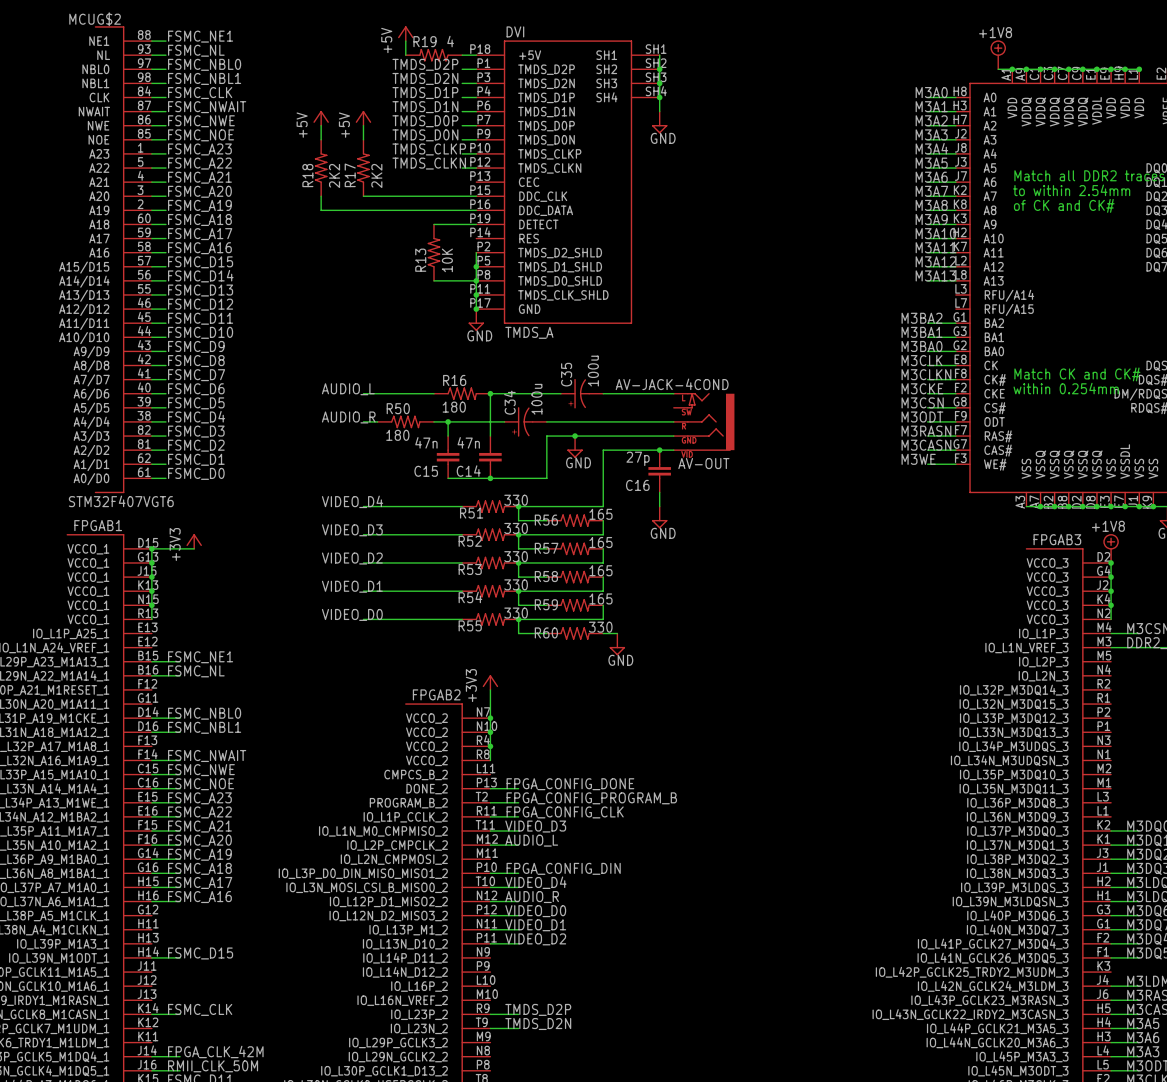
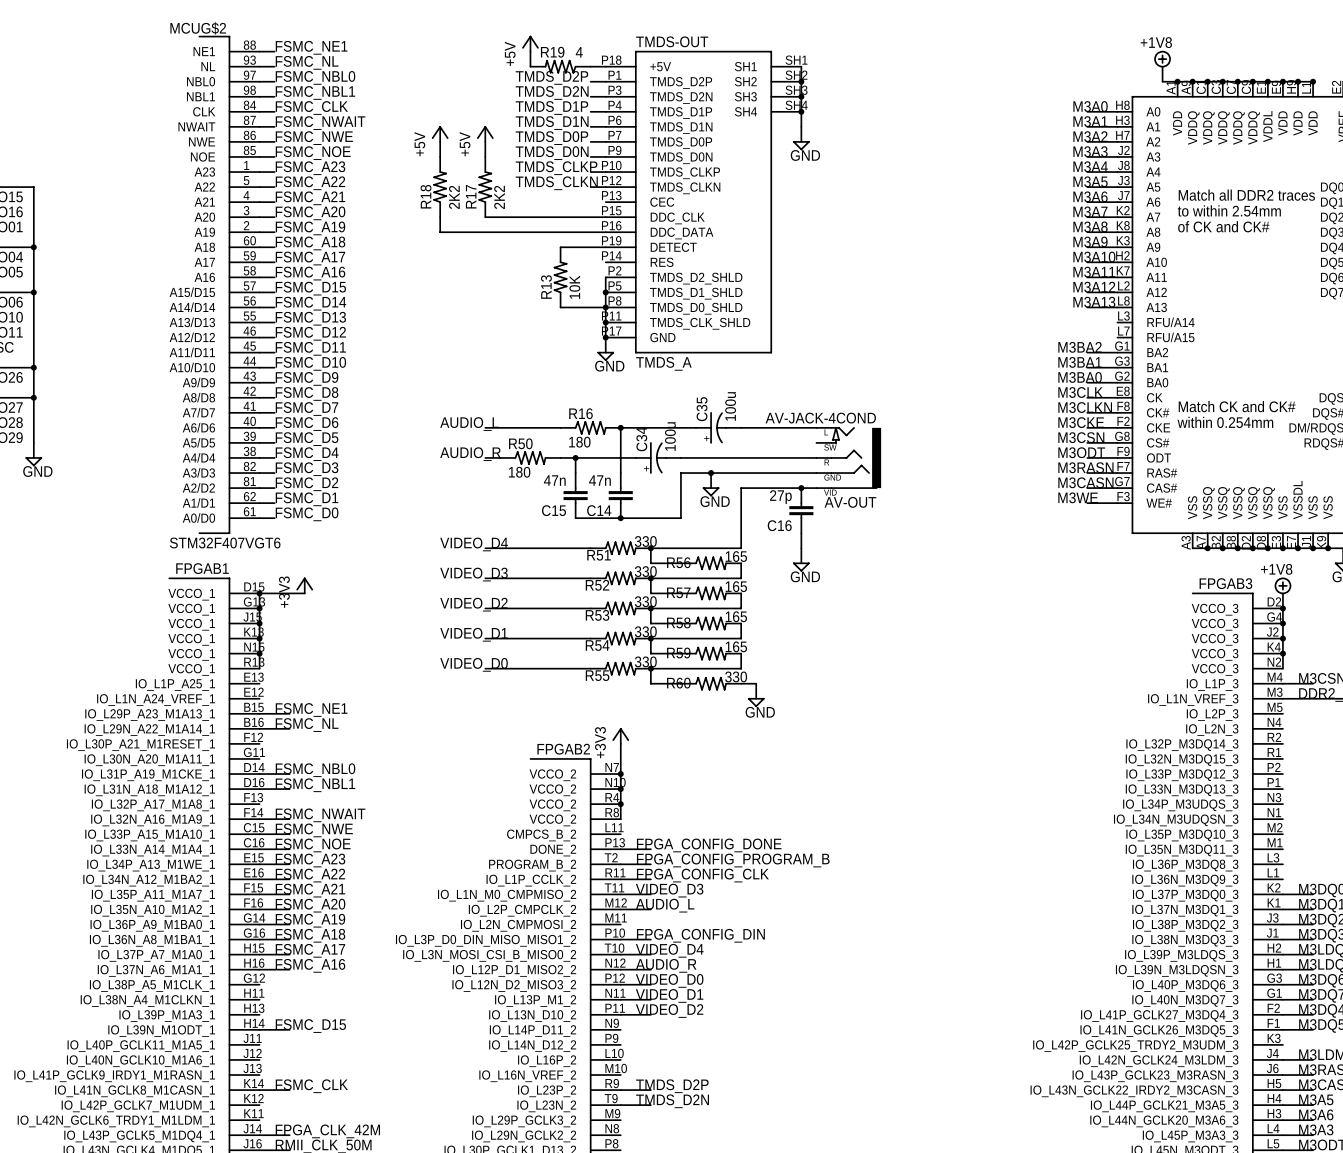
DVI name: DVI (515, 31) -> TMDS-OUT (672, 41)

